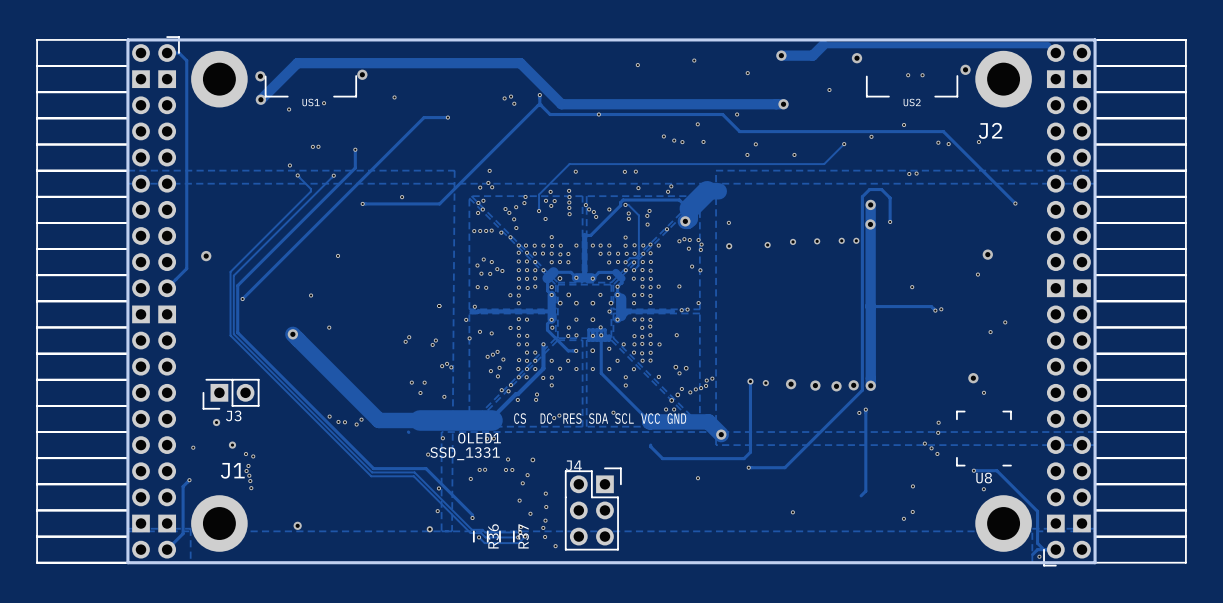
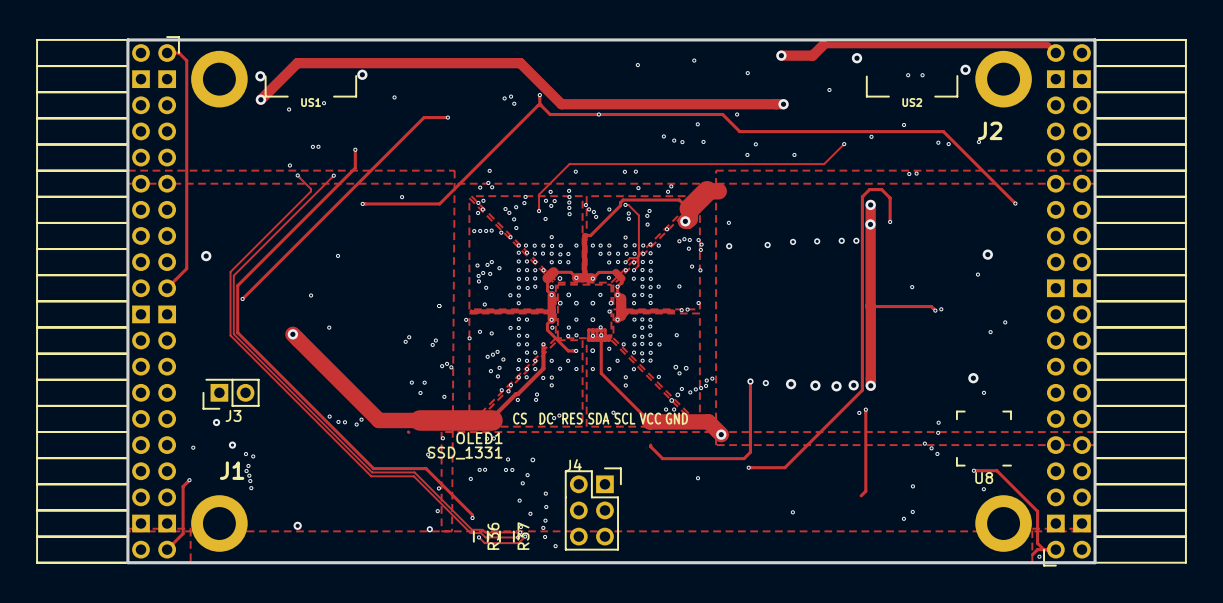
via: (483, 259) -> none
via: none -> (487, 264)
via: none -> (499, 268)
via: (497, 269) -> none
via: (502, 270) -> none
via: (481, 273) -> none
via: none -> (483, 273)
via: none -> (478, 275)
via: none -> (478, 281)
via: (477, 287) -> none
via: none -> (484, 304)
via: (474, 306) -> none

